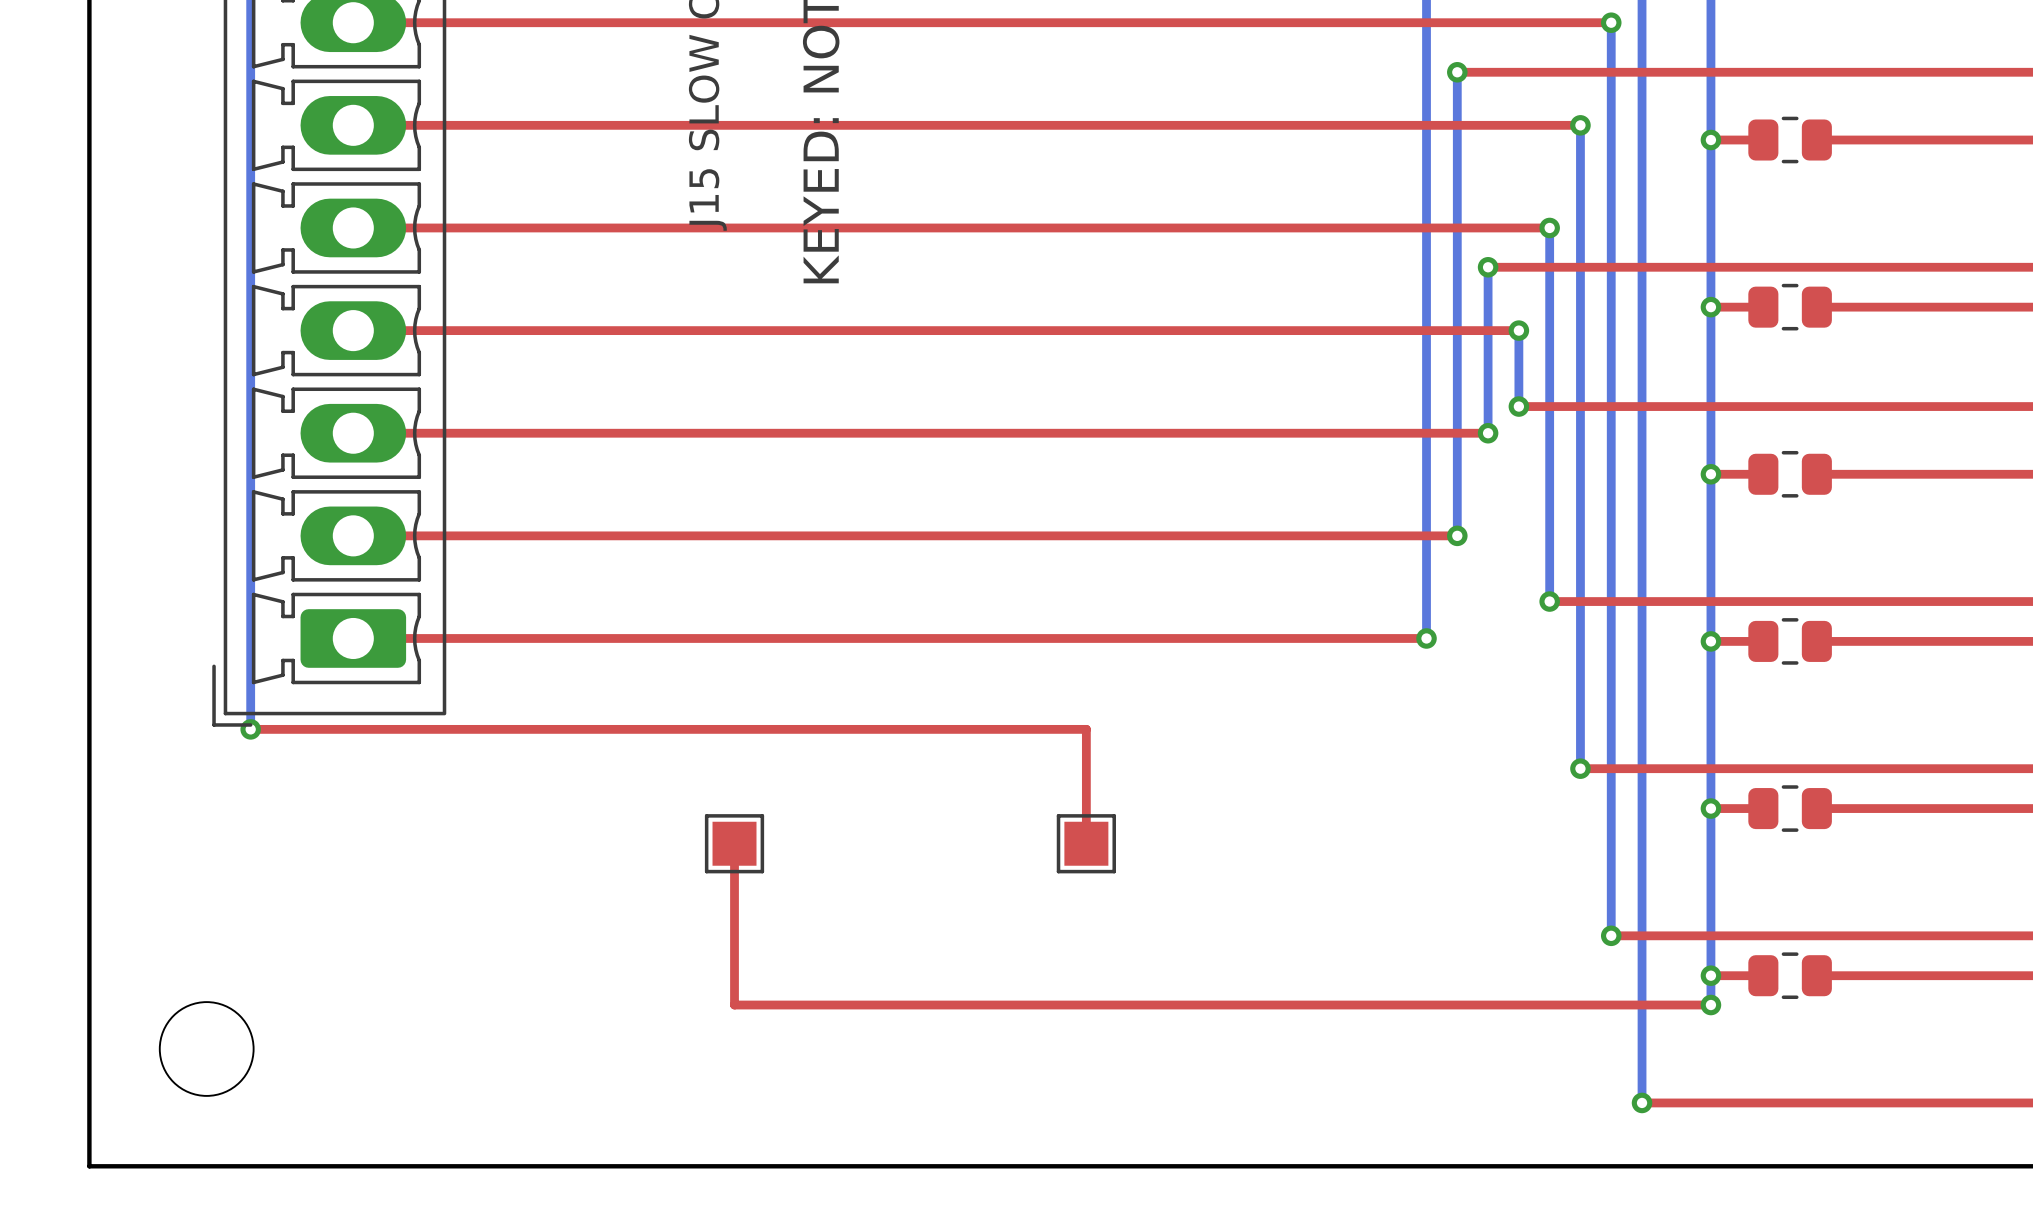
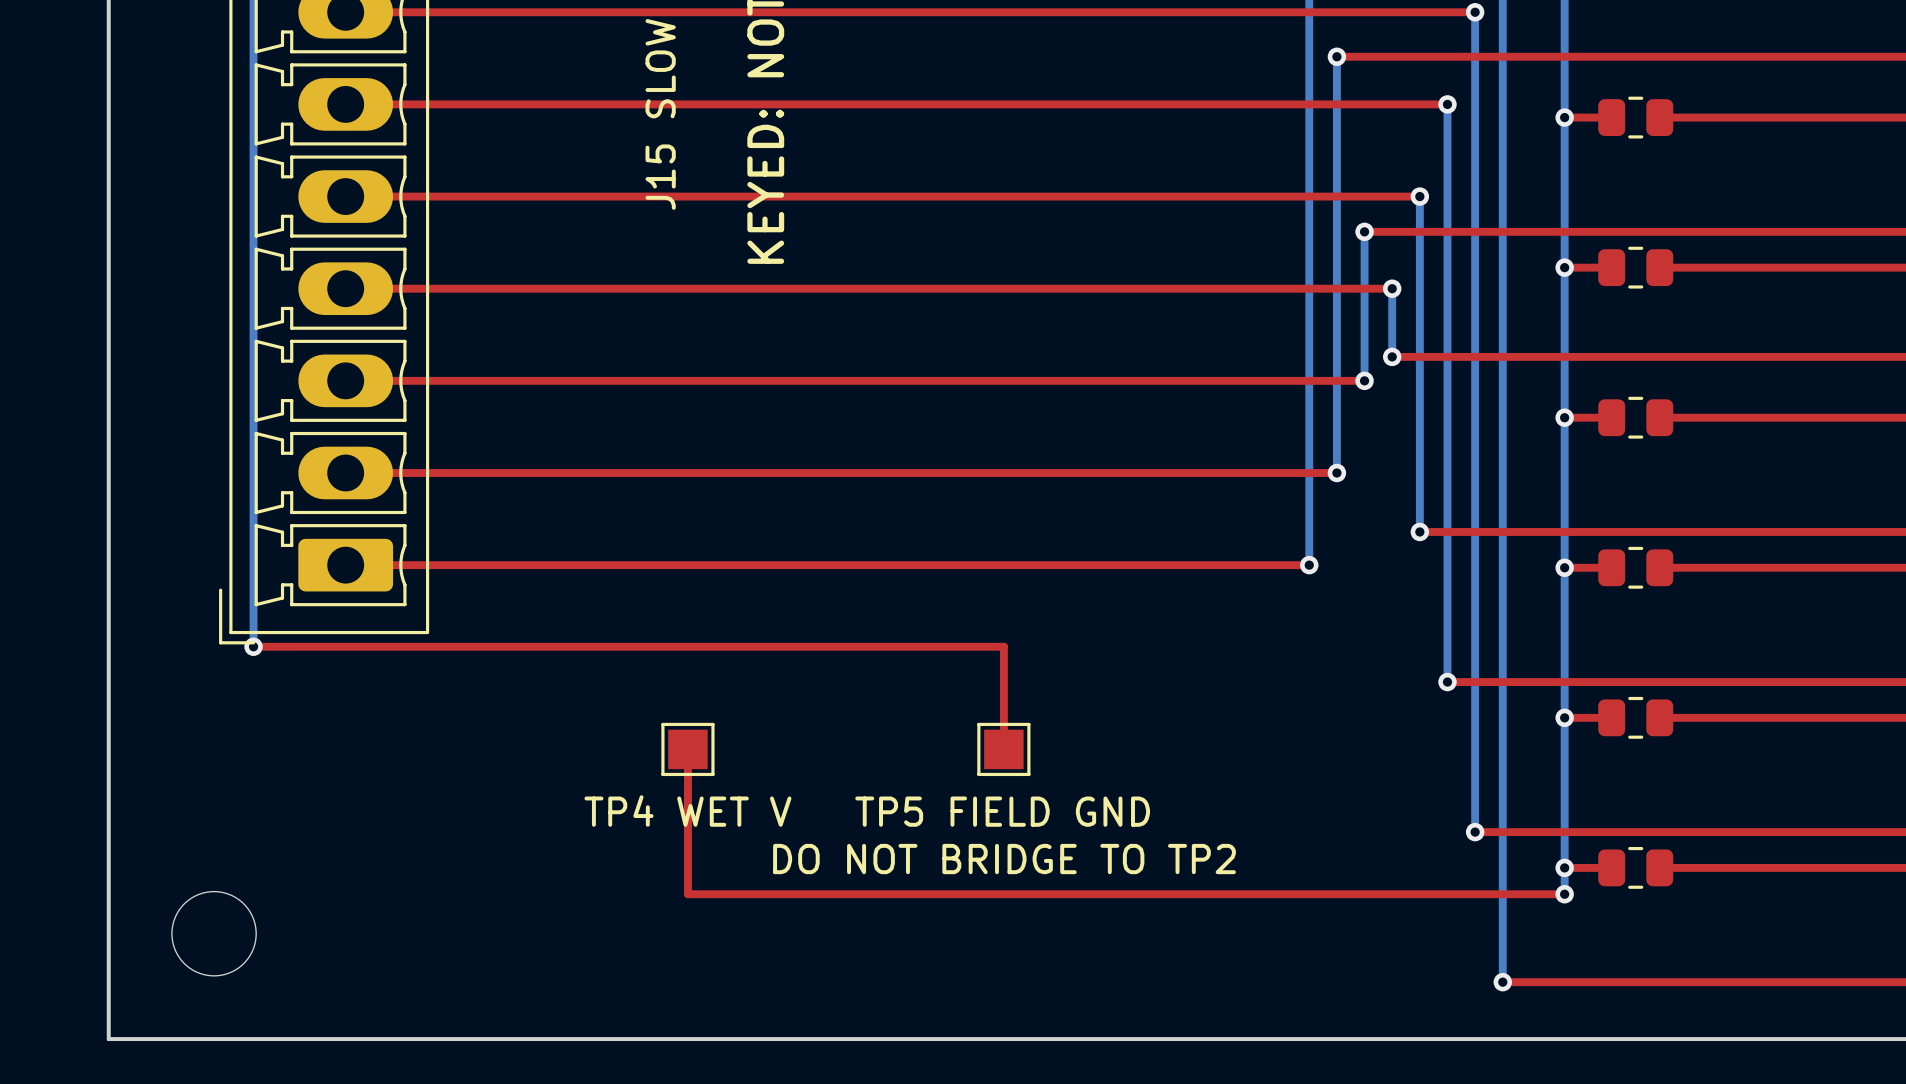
text: none -> TP4 WET V (687, 811)
text: none -> TP5 FIELD GND (1002, 811)
text: none -> DO NOT BRIDGE TO TP2 (1004, 859)

